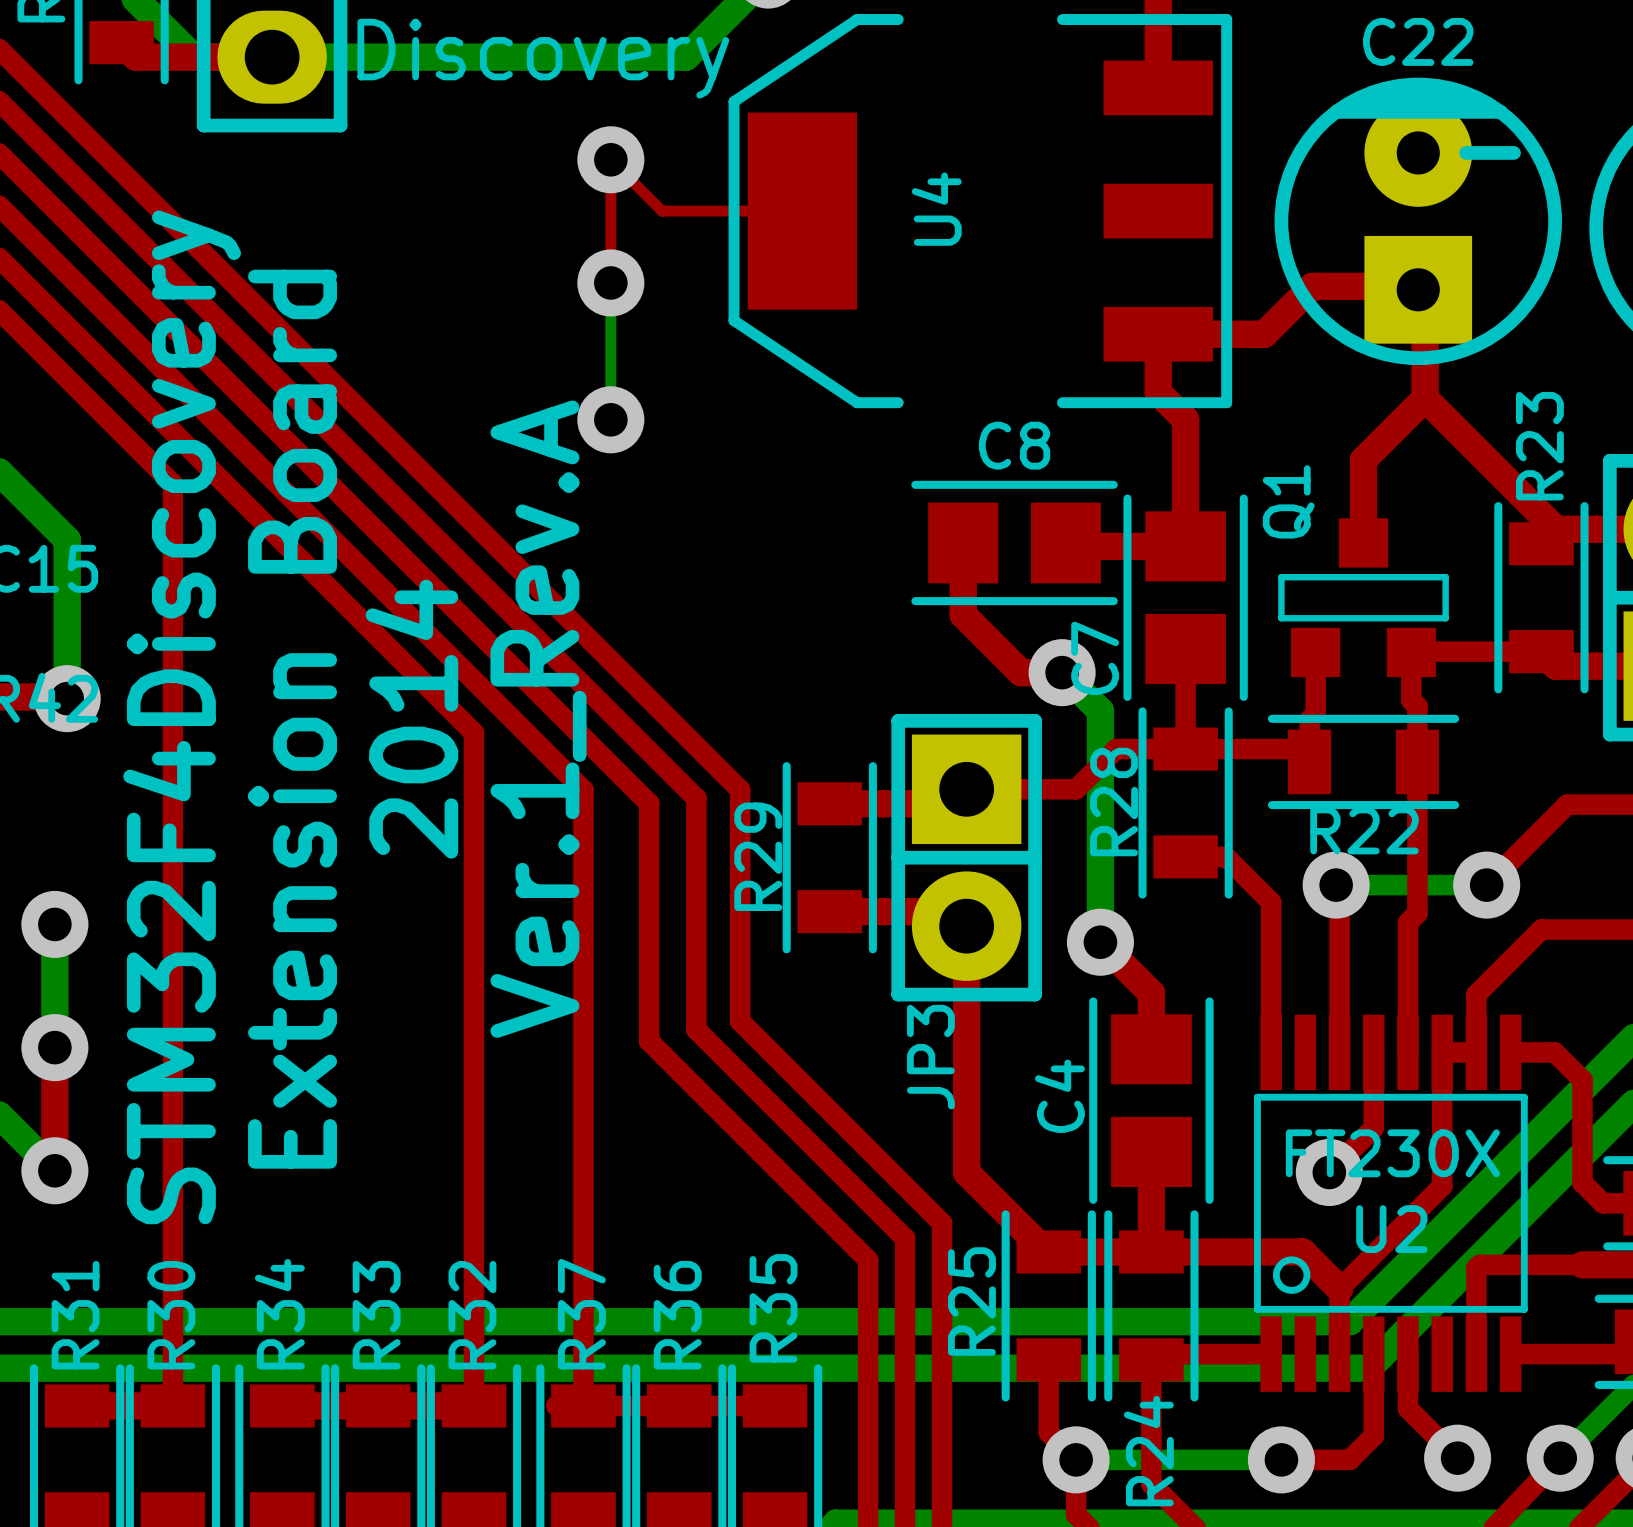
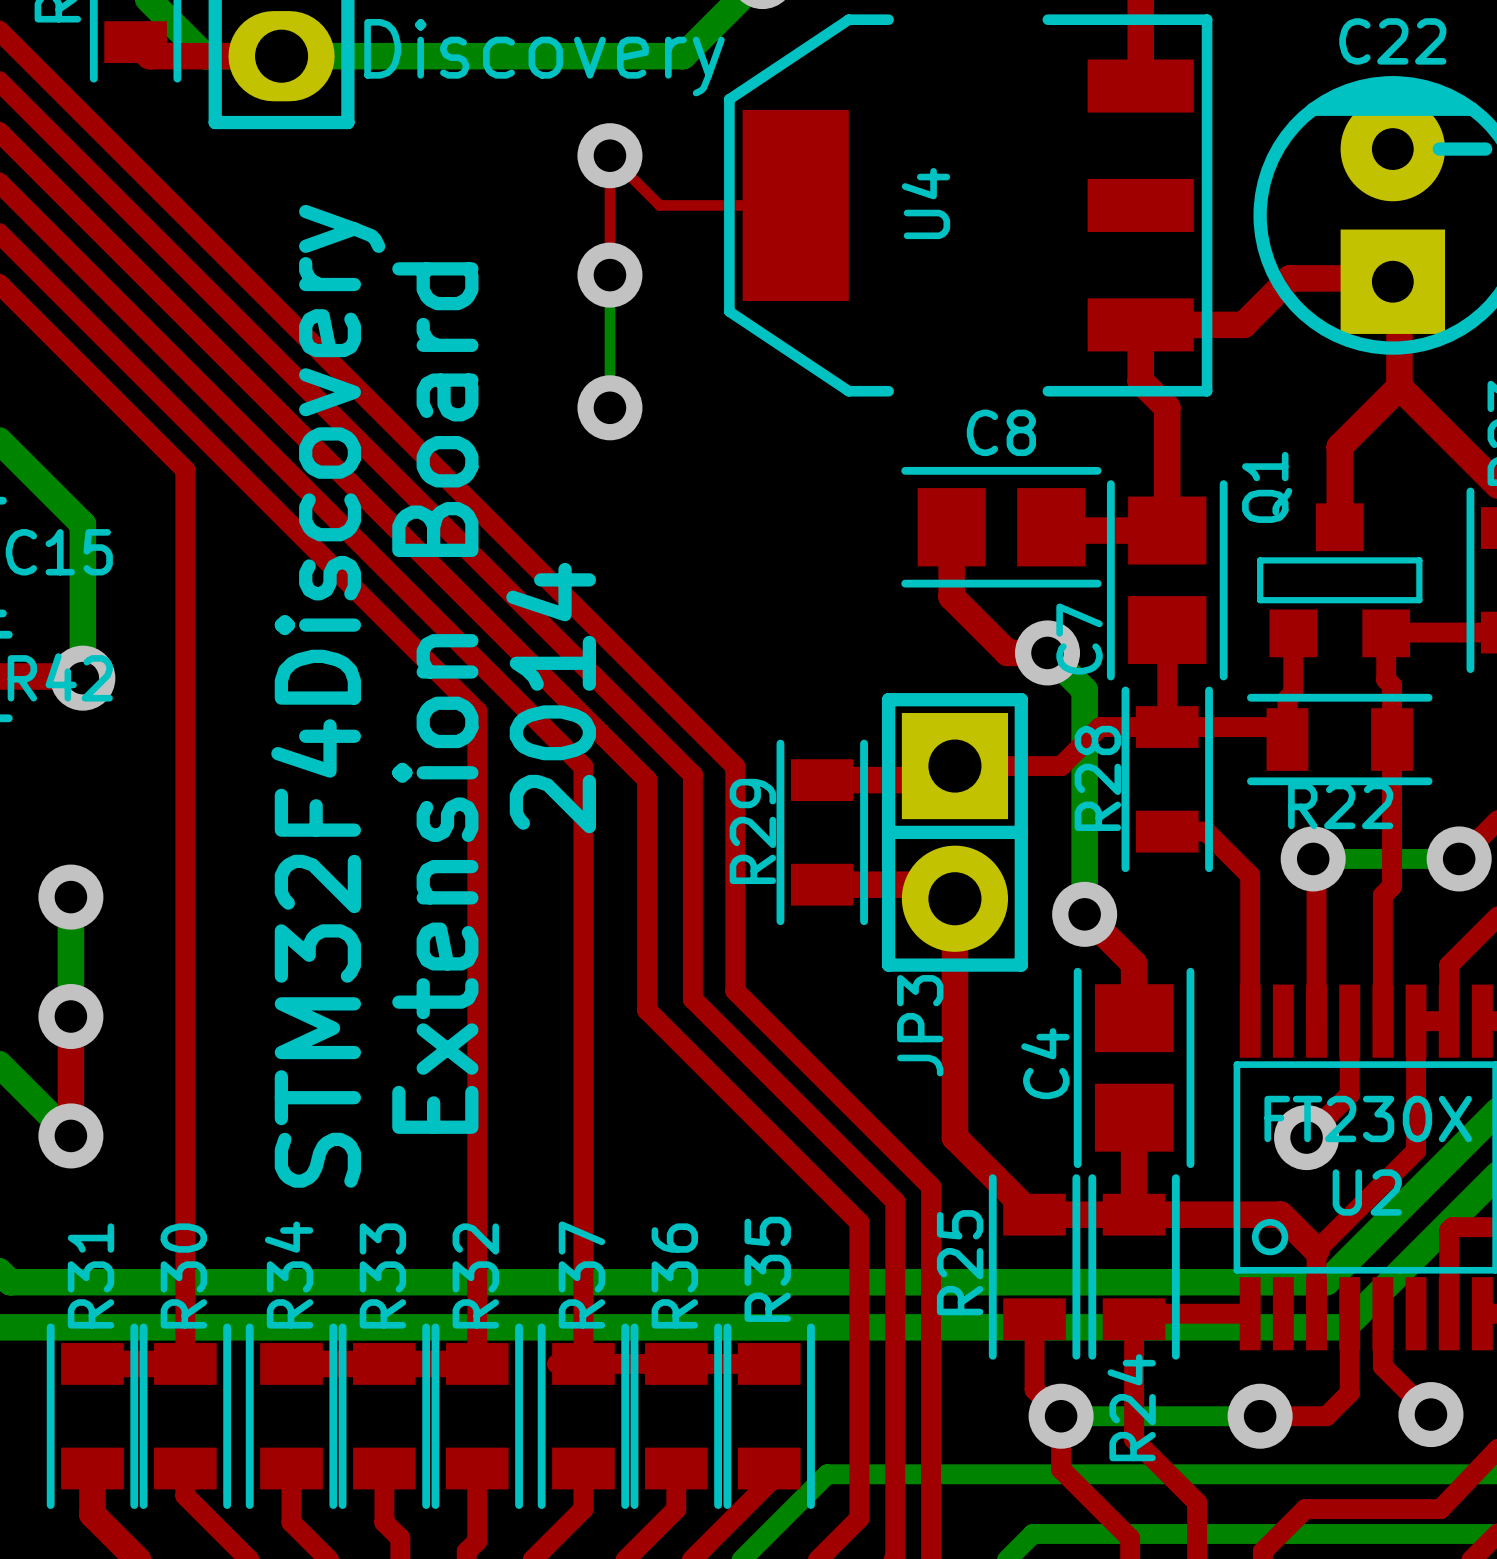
text: STM32F4Discovery (182, 717) -> none
text: Extension Board (292, 719) -> STM32F4Discovery (328, 696)
text: 2014 (411, 719) -> Extension Board (435, 698)
text: Ver.1_Rev.A (538, 719) -> 2014 (551, 698)

